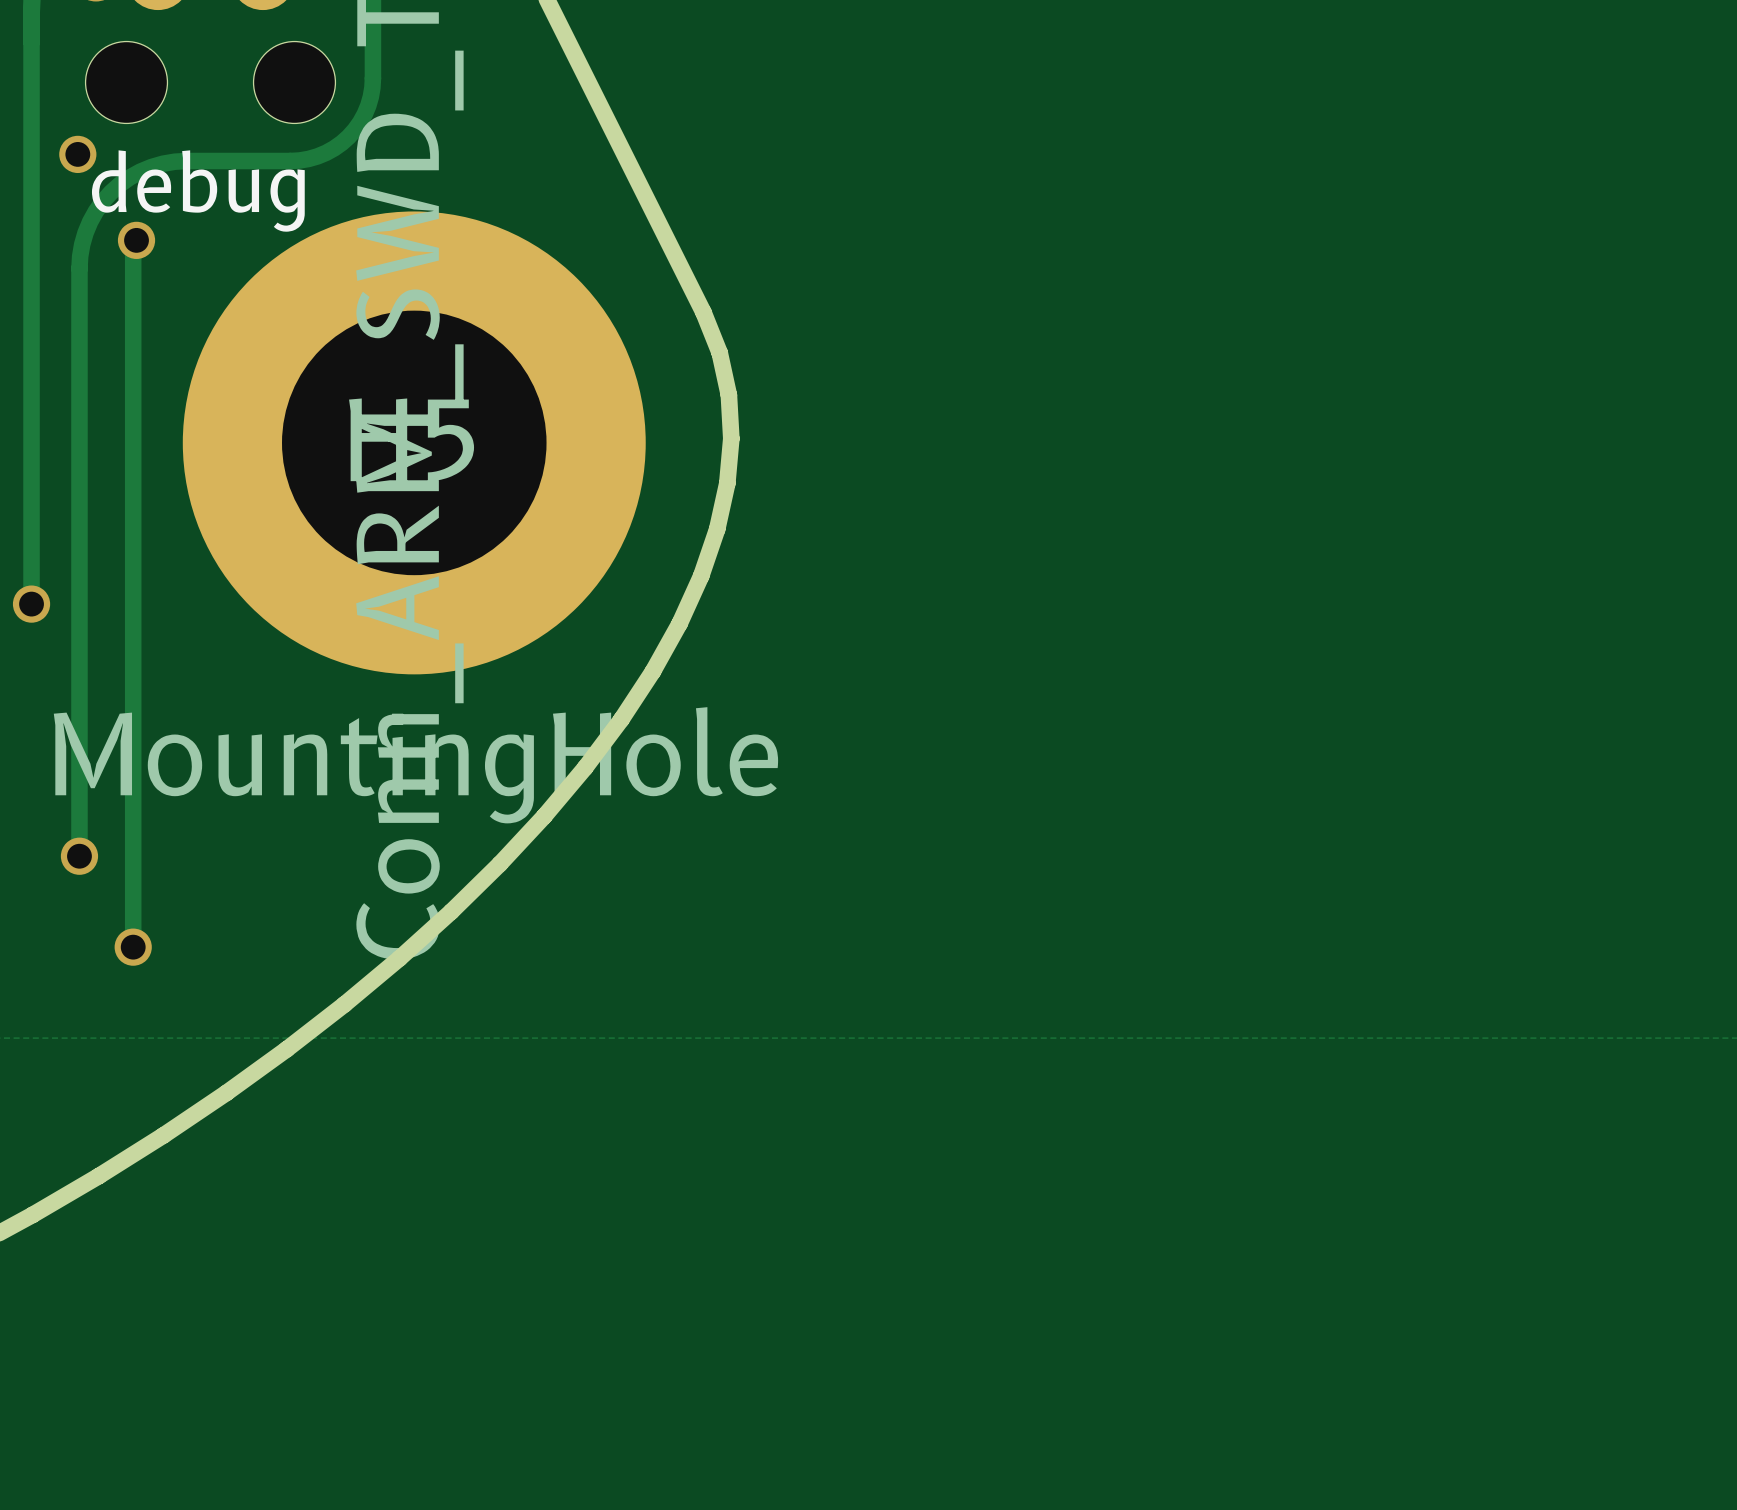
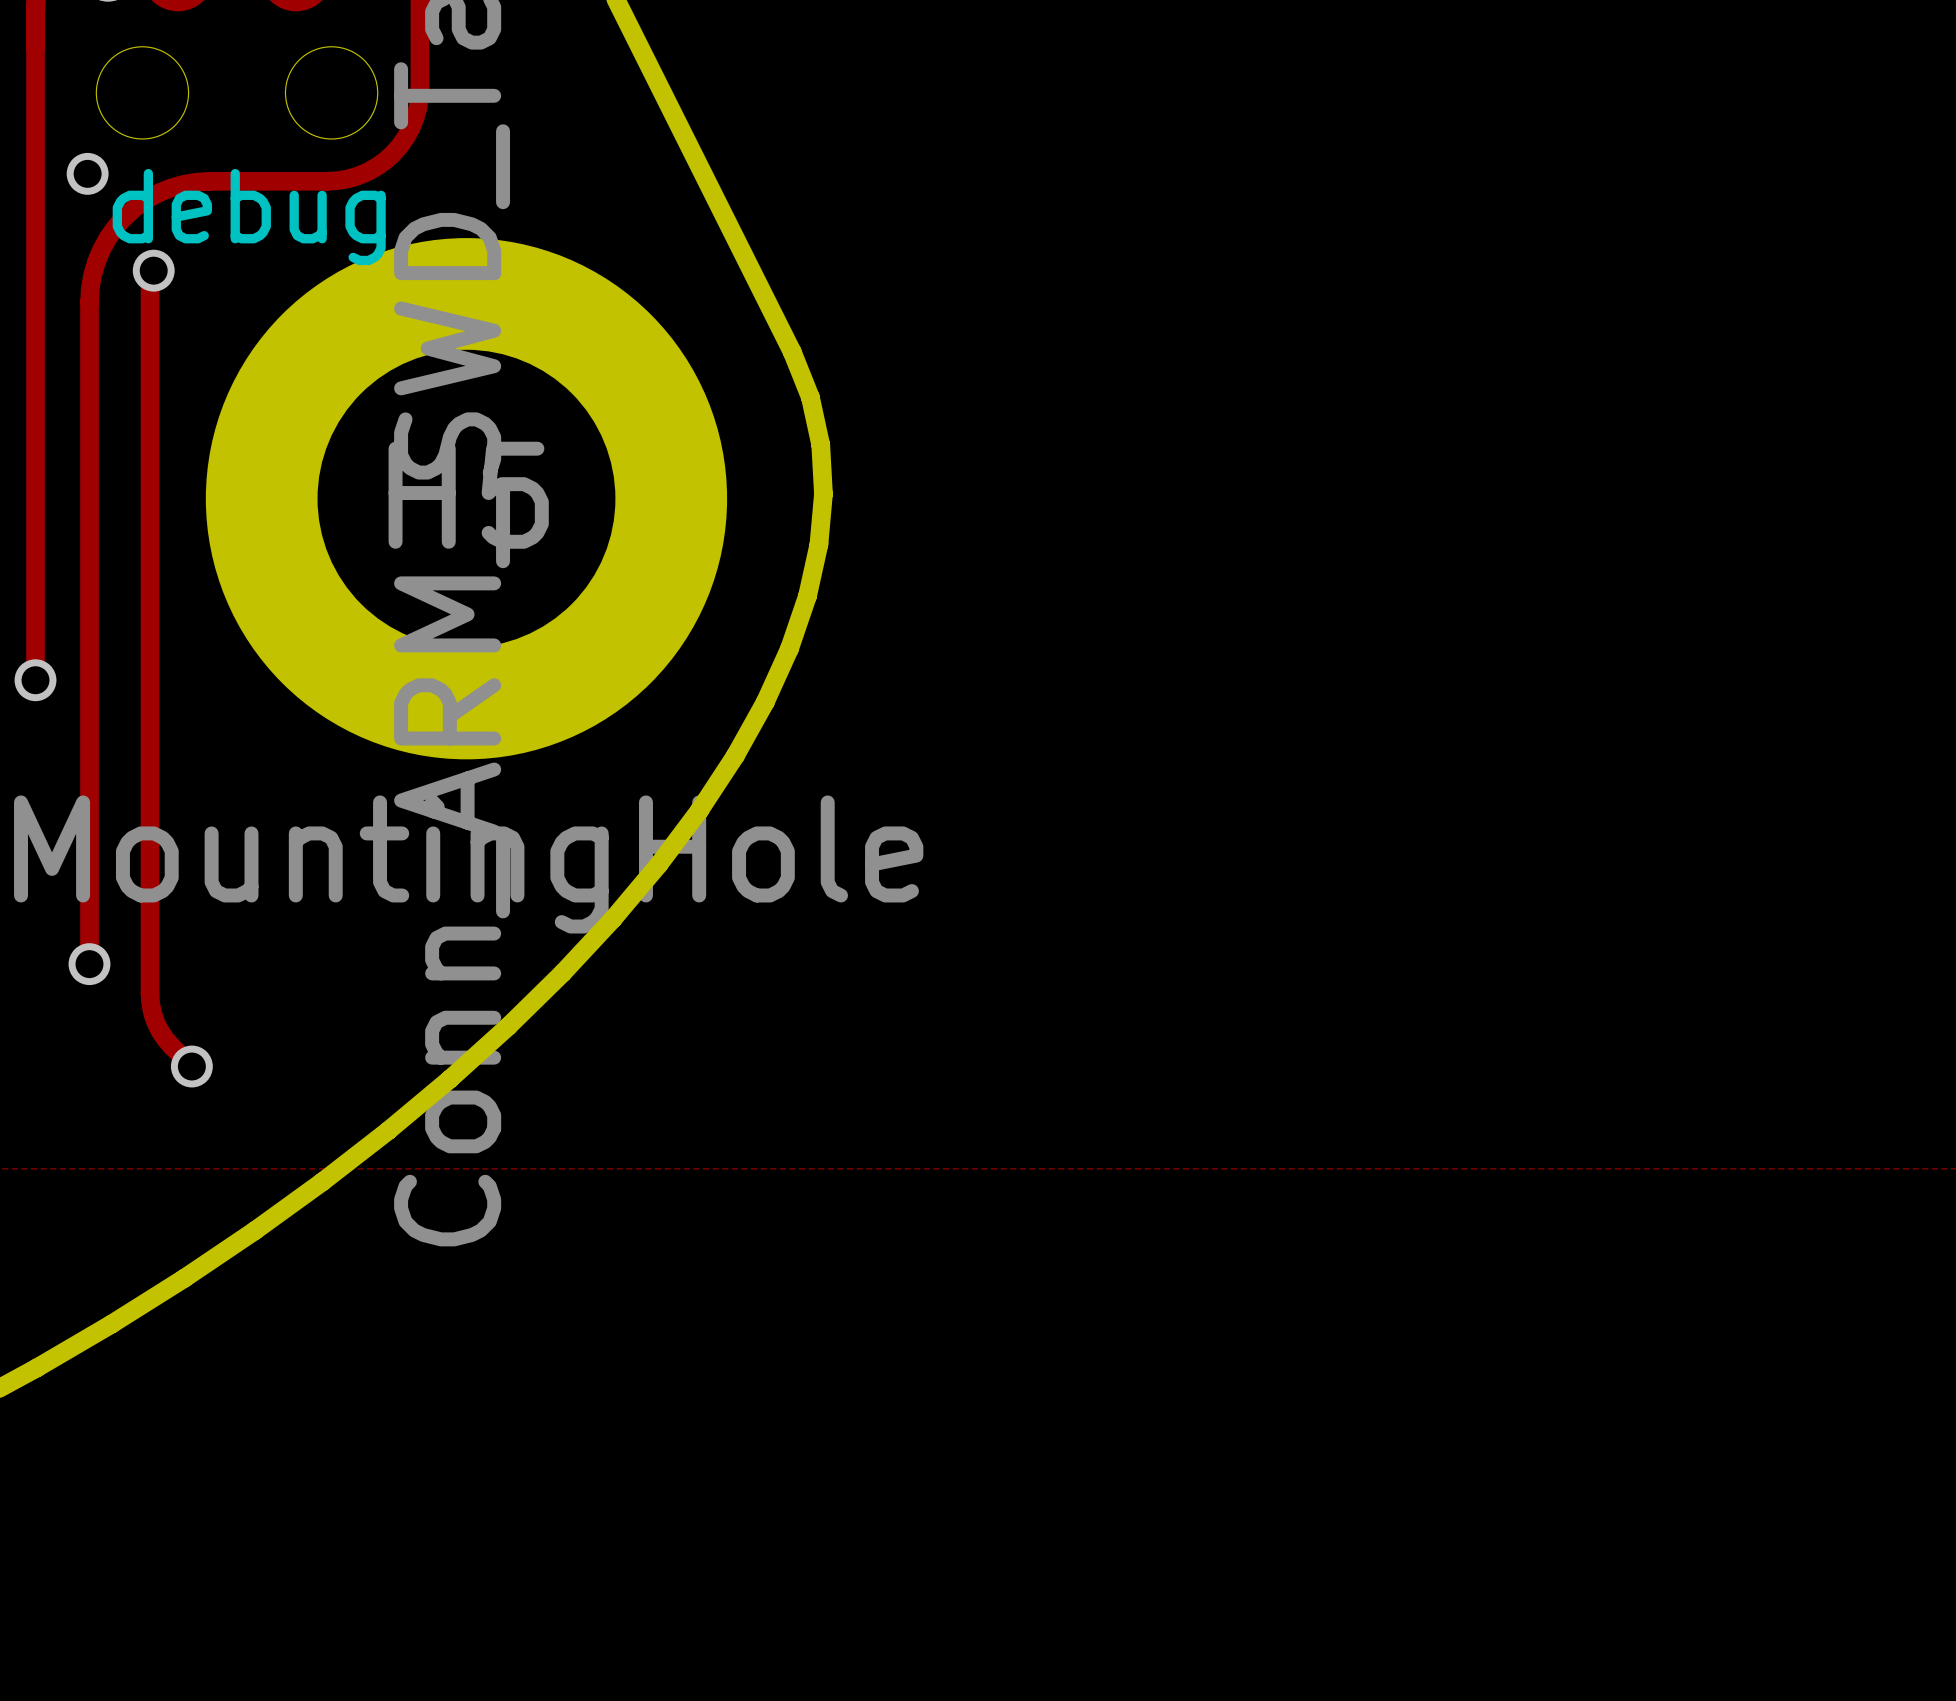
track: (133, 882) (133, 947) -> (149, 993) (152, 1013) (159, 1031) (171, 1046) (191, 1066)
via position: (133, 947) -> (191, 1066)

